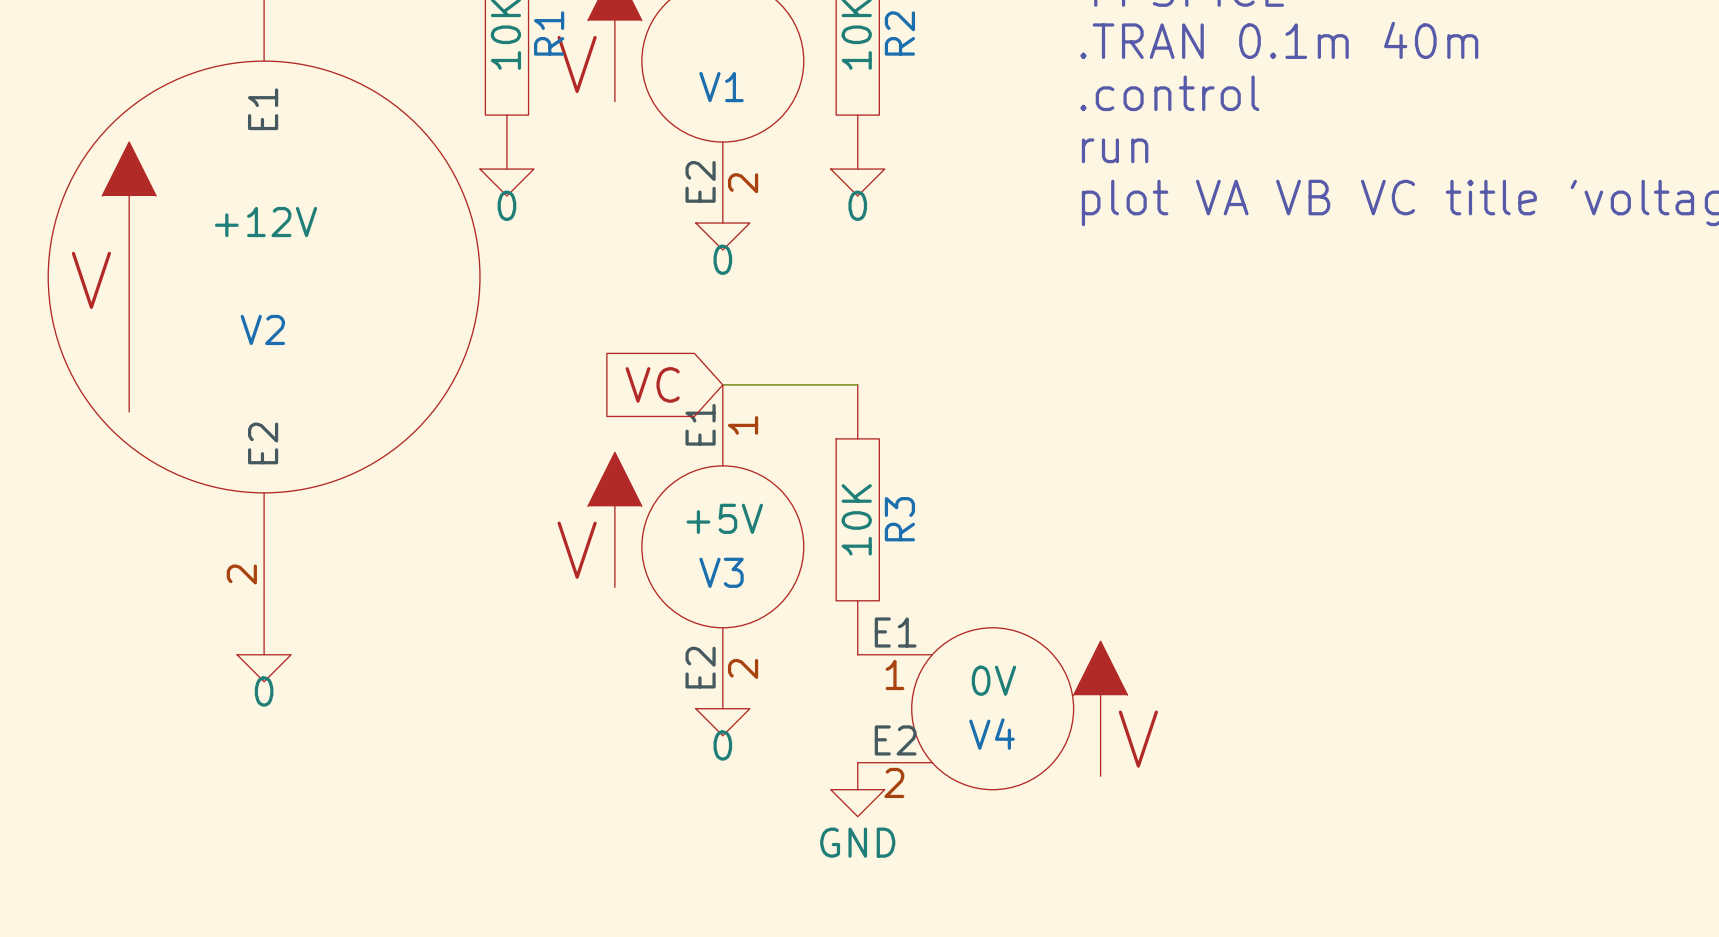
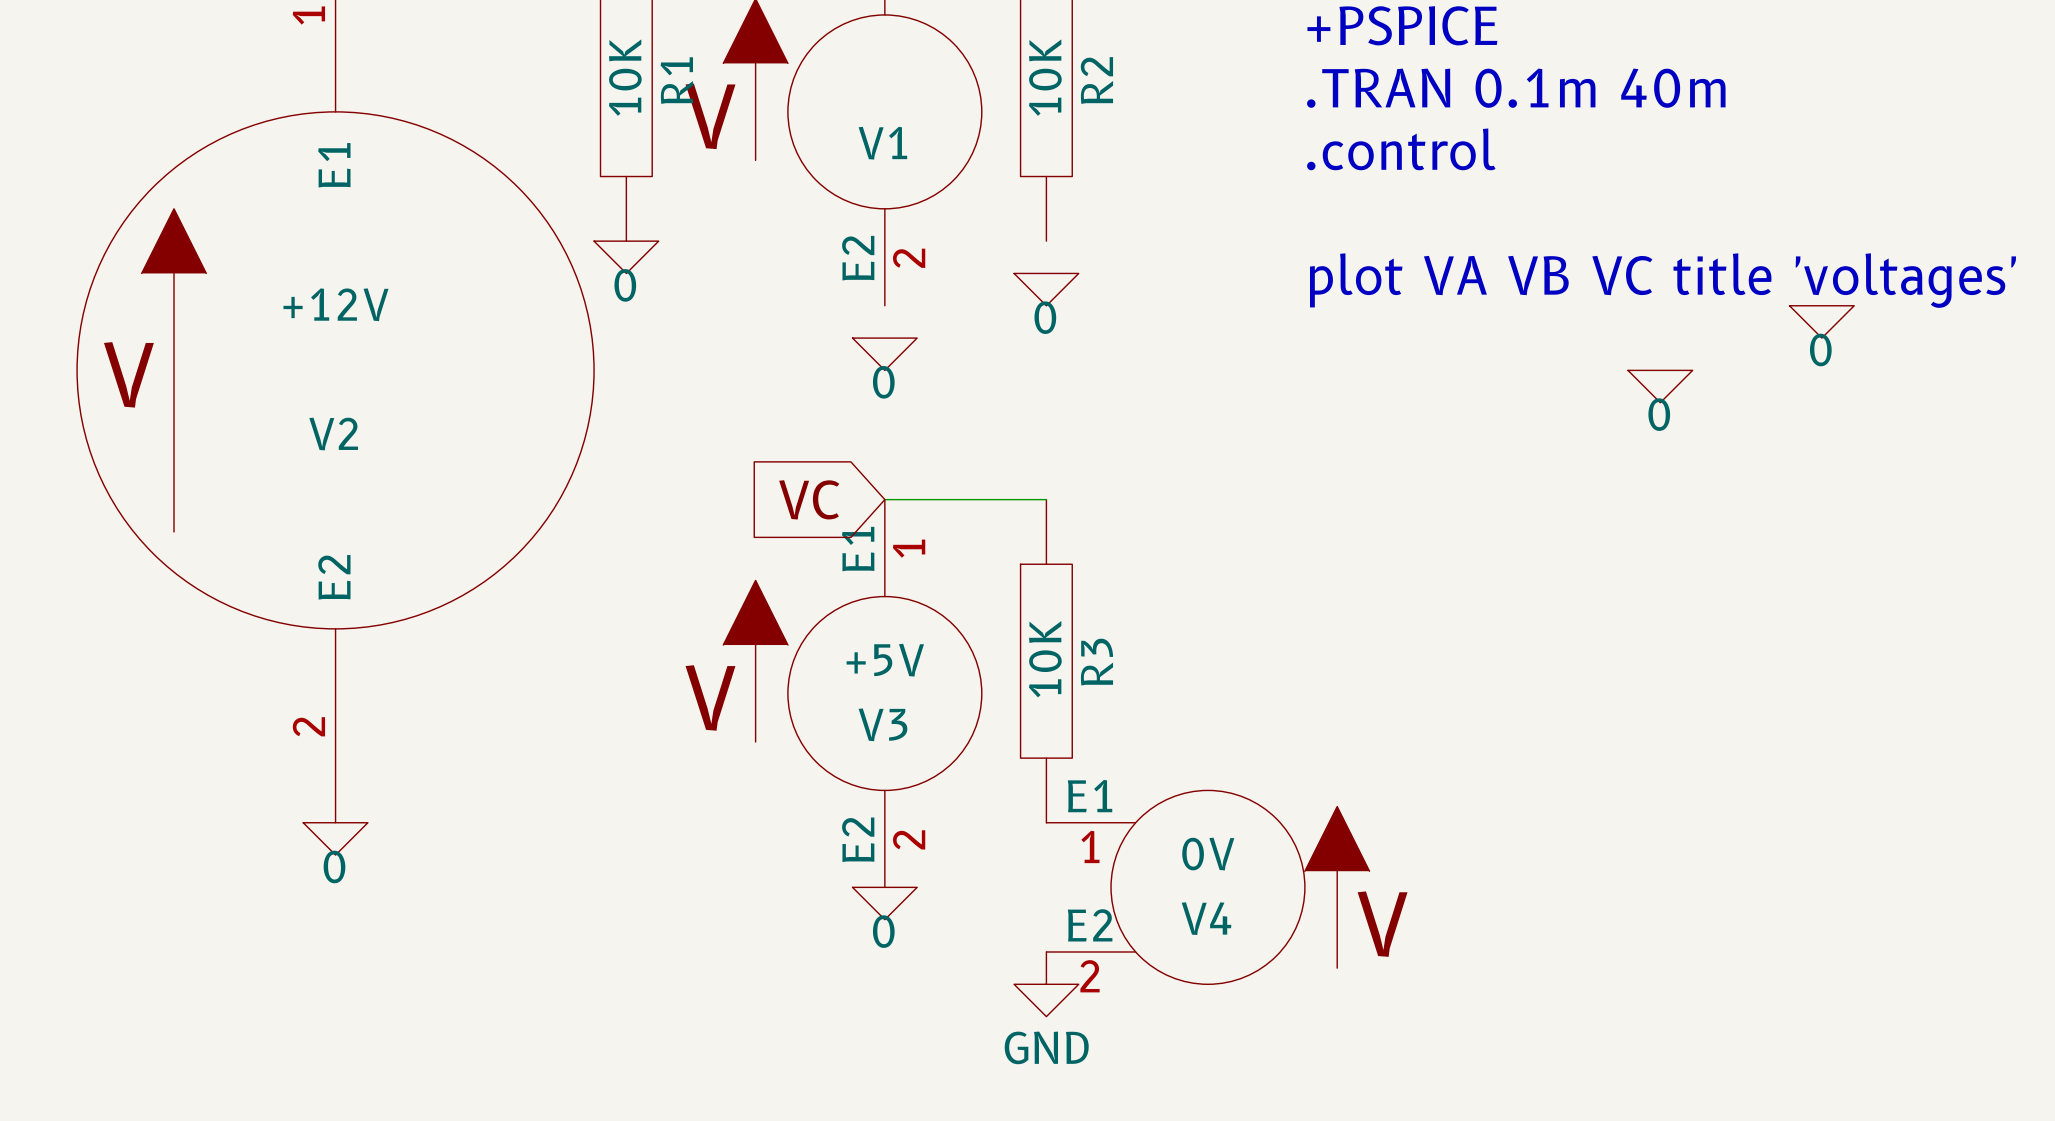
text: run (1115, 150) -> none
power symbol position: 0 (857, 182) -> 0 (1046, 289)
power symbol position: 0 (722, 236) -> 0 (884, 354)
power symbol: none -> 0 (1821, 321)
power symbol: none -> 0 (1660, 386)

